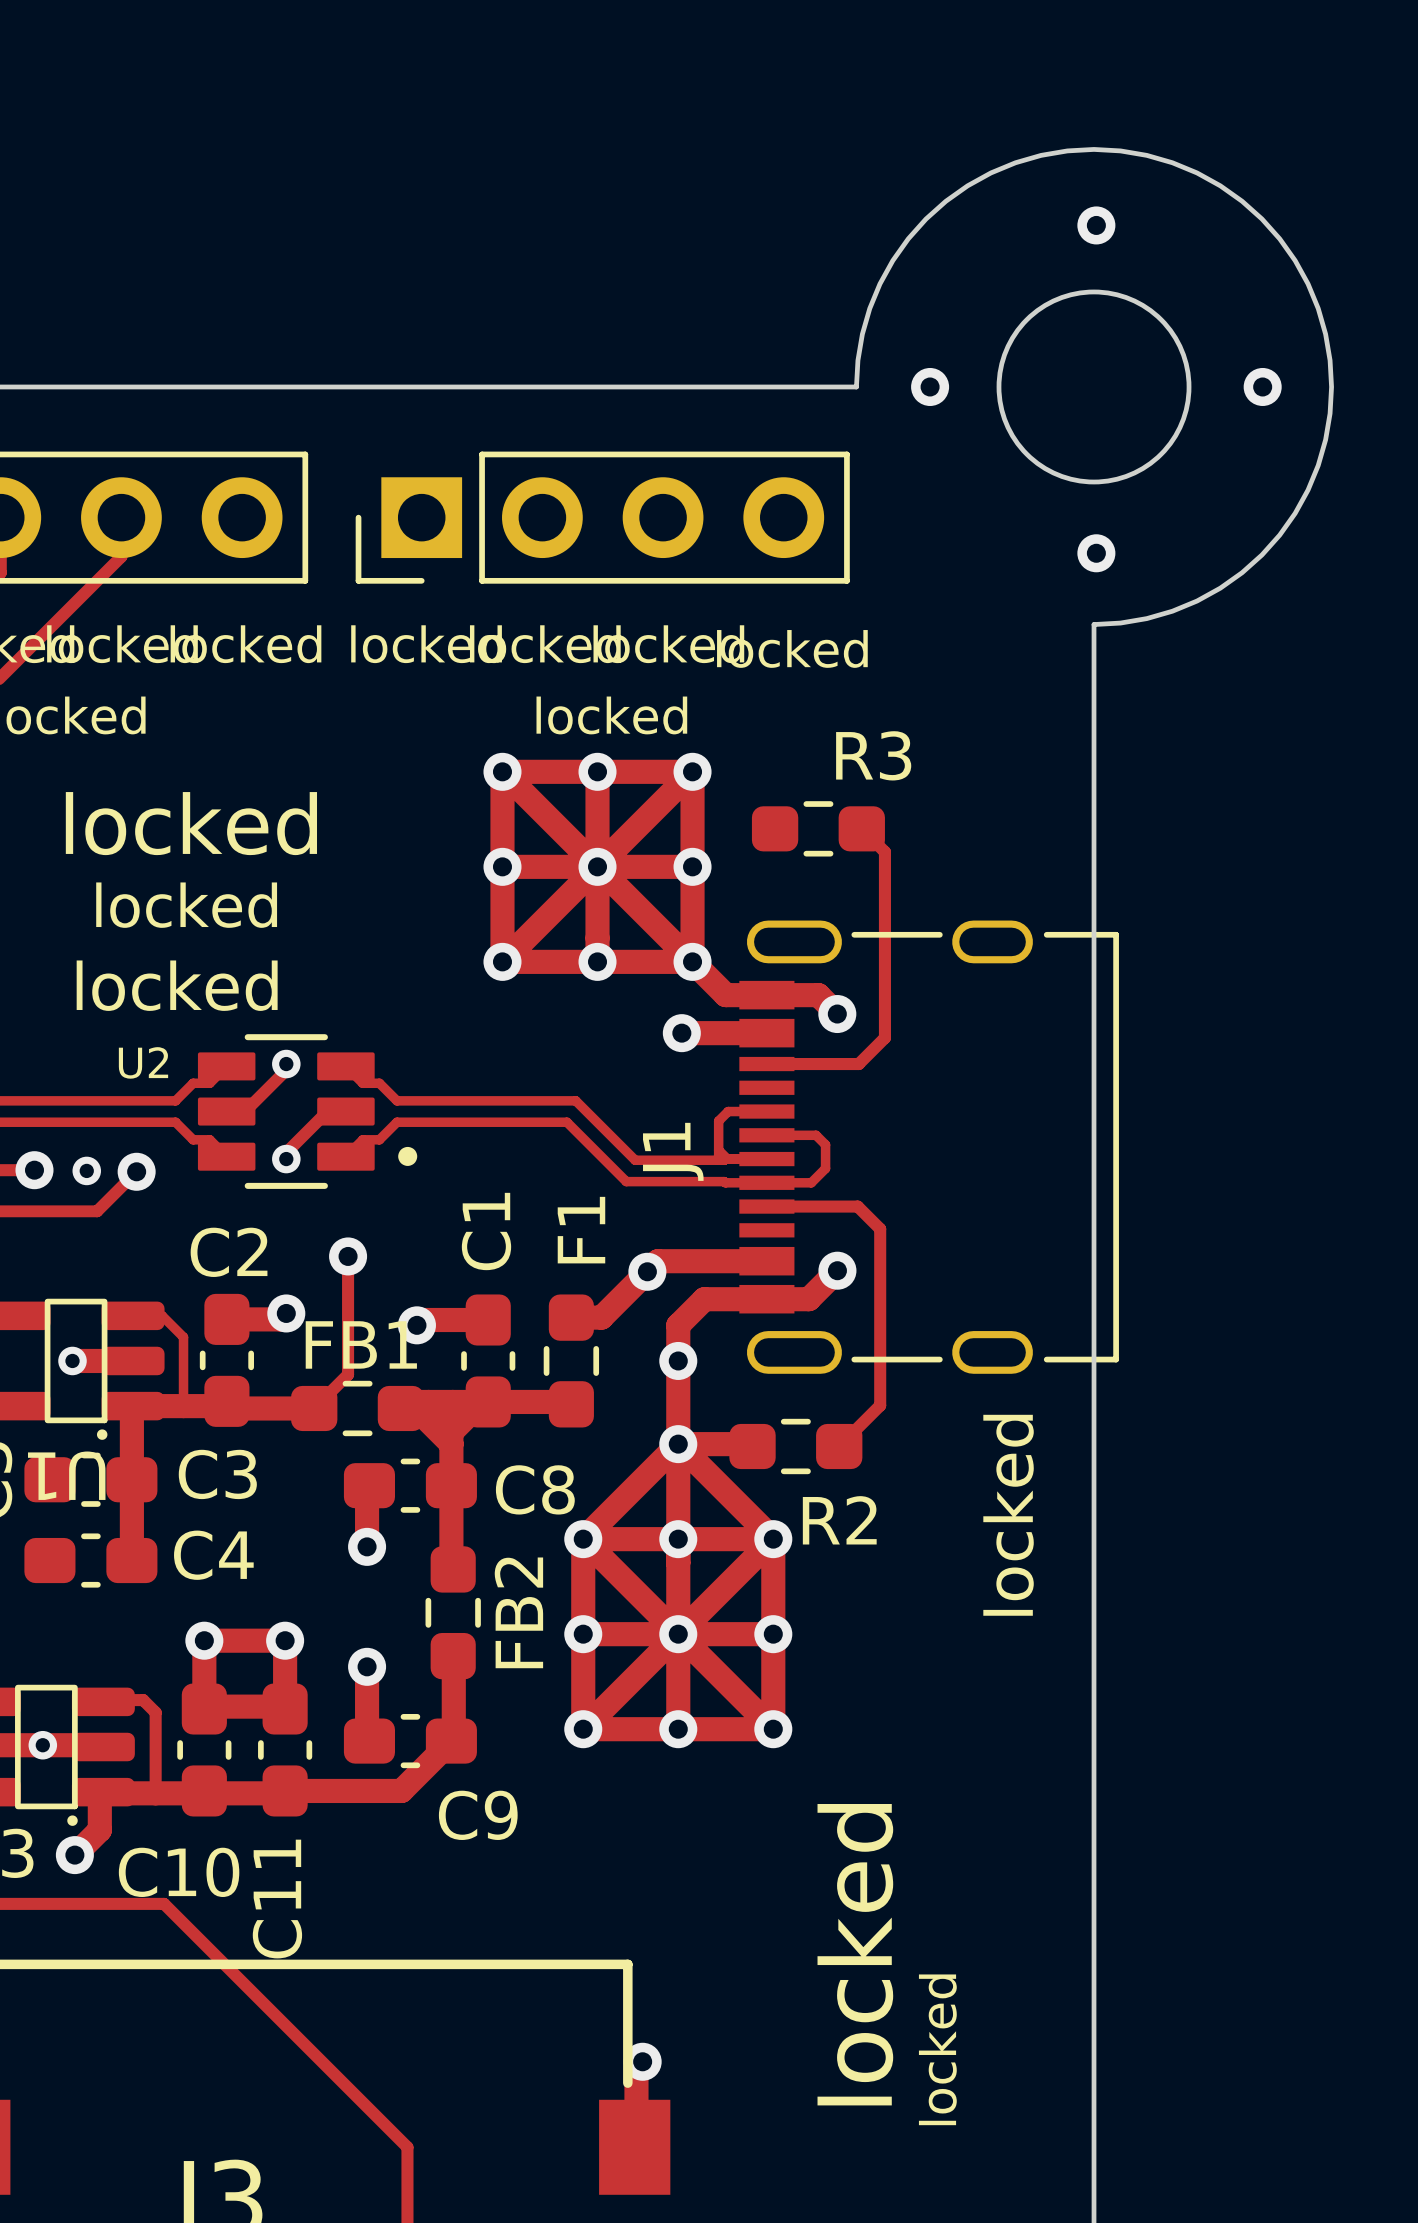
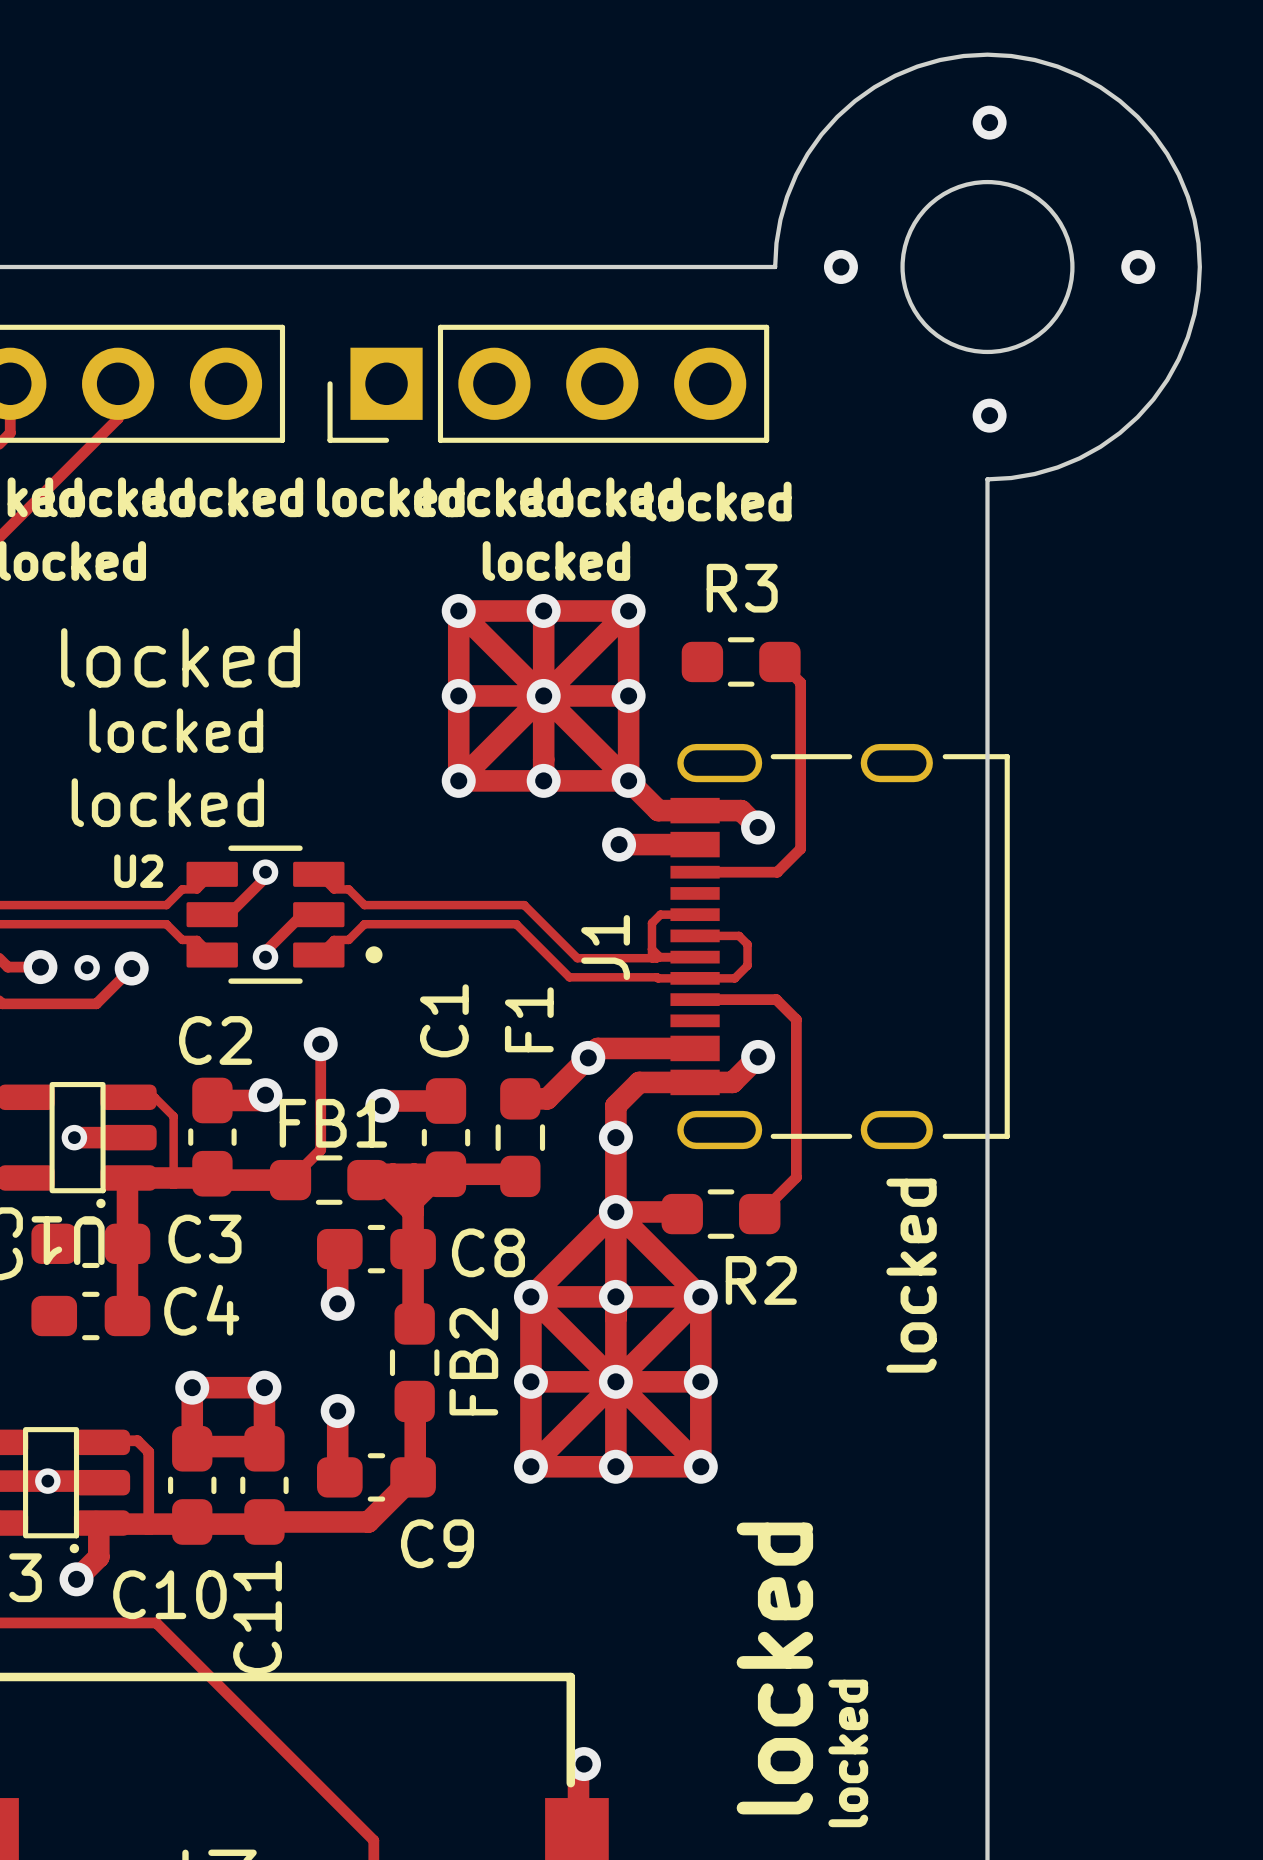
R3 name position: R3 (873, 755) -> R3 (742, 588)

